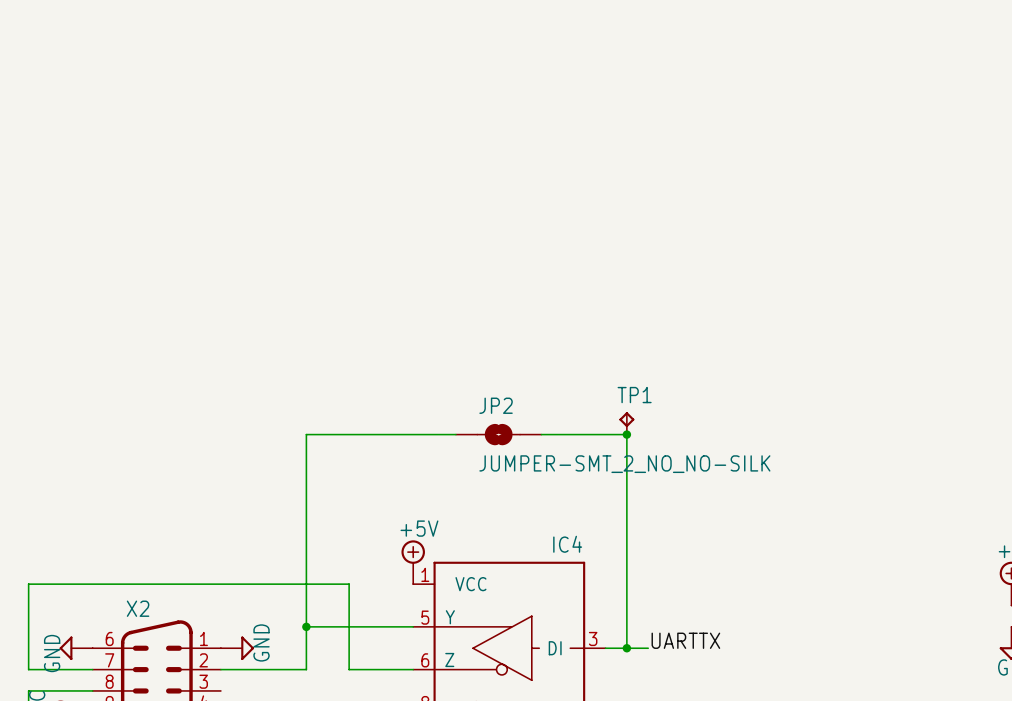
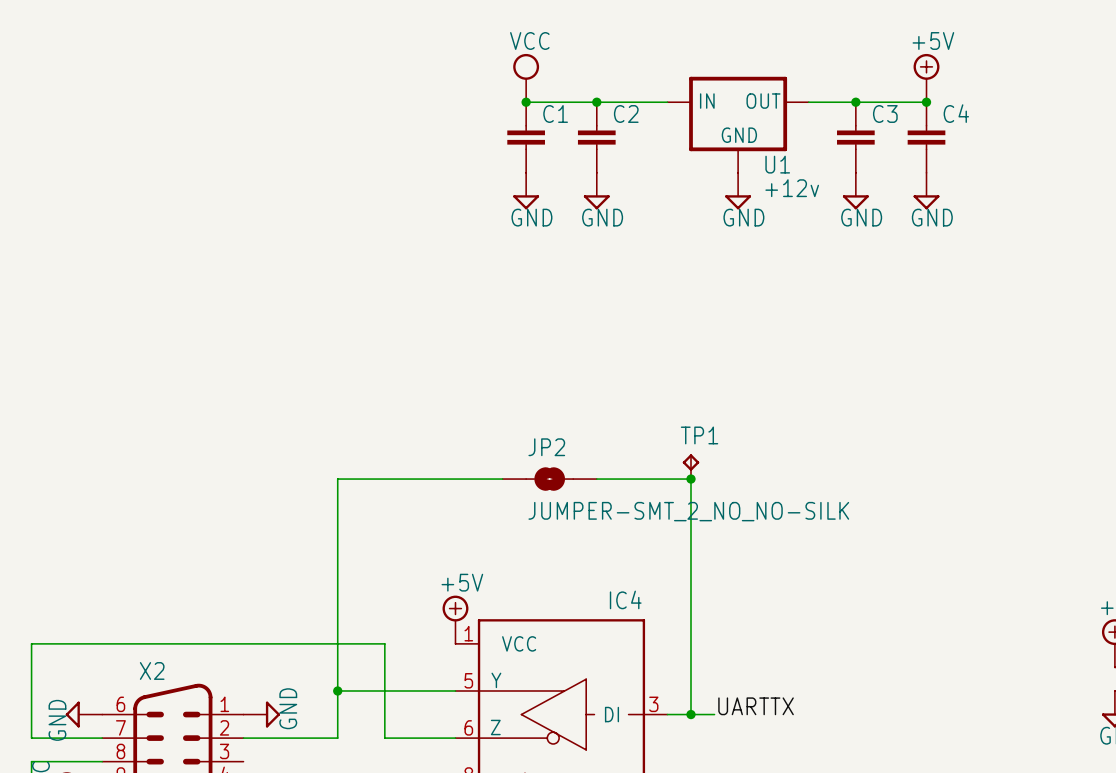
power symbol: none -> VCC (526, 78)
power symbol: none -> +5V (926, 78)
wire: none -> (526, 102) (667, 102)
junction: none -> (526, 102)
junction: none -> (596, 102)
wire: none -> (808, 102) (926, 102)
junction: none -> (855, 102)
junction: none -> (926, 102)
U1: none -> +12v (738, 124)
C1: none -> (526, 137)
C2: none -> (596, 137)
C3: none -> (855, 137)
C4: none -> (926, 137)
power symbol: none -> GND (526, 191)
power symbol: none -> GND (596, 191)
power symbol: none -> GND (738, 191)
power symbol: none -> GND (855, 191)
power symbol: none -> GND (926, 191)

